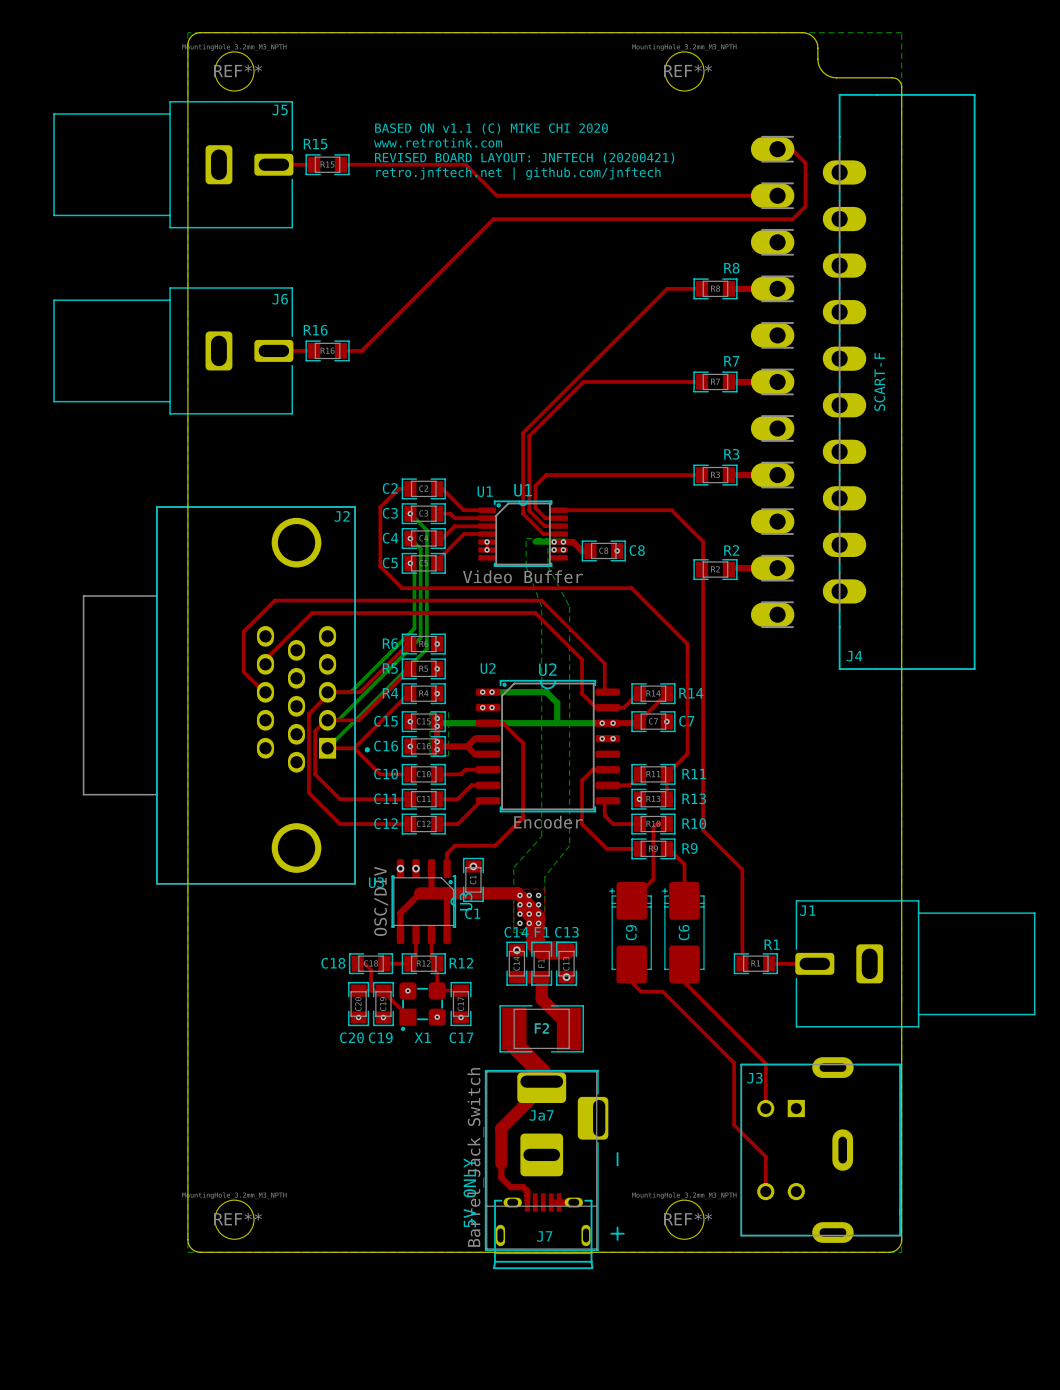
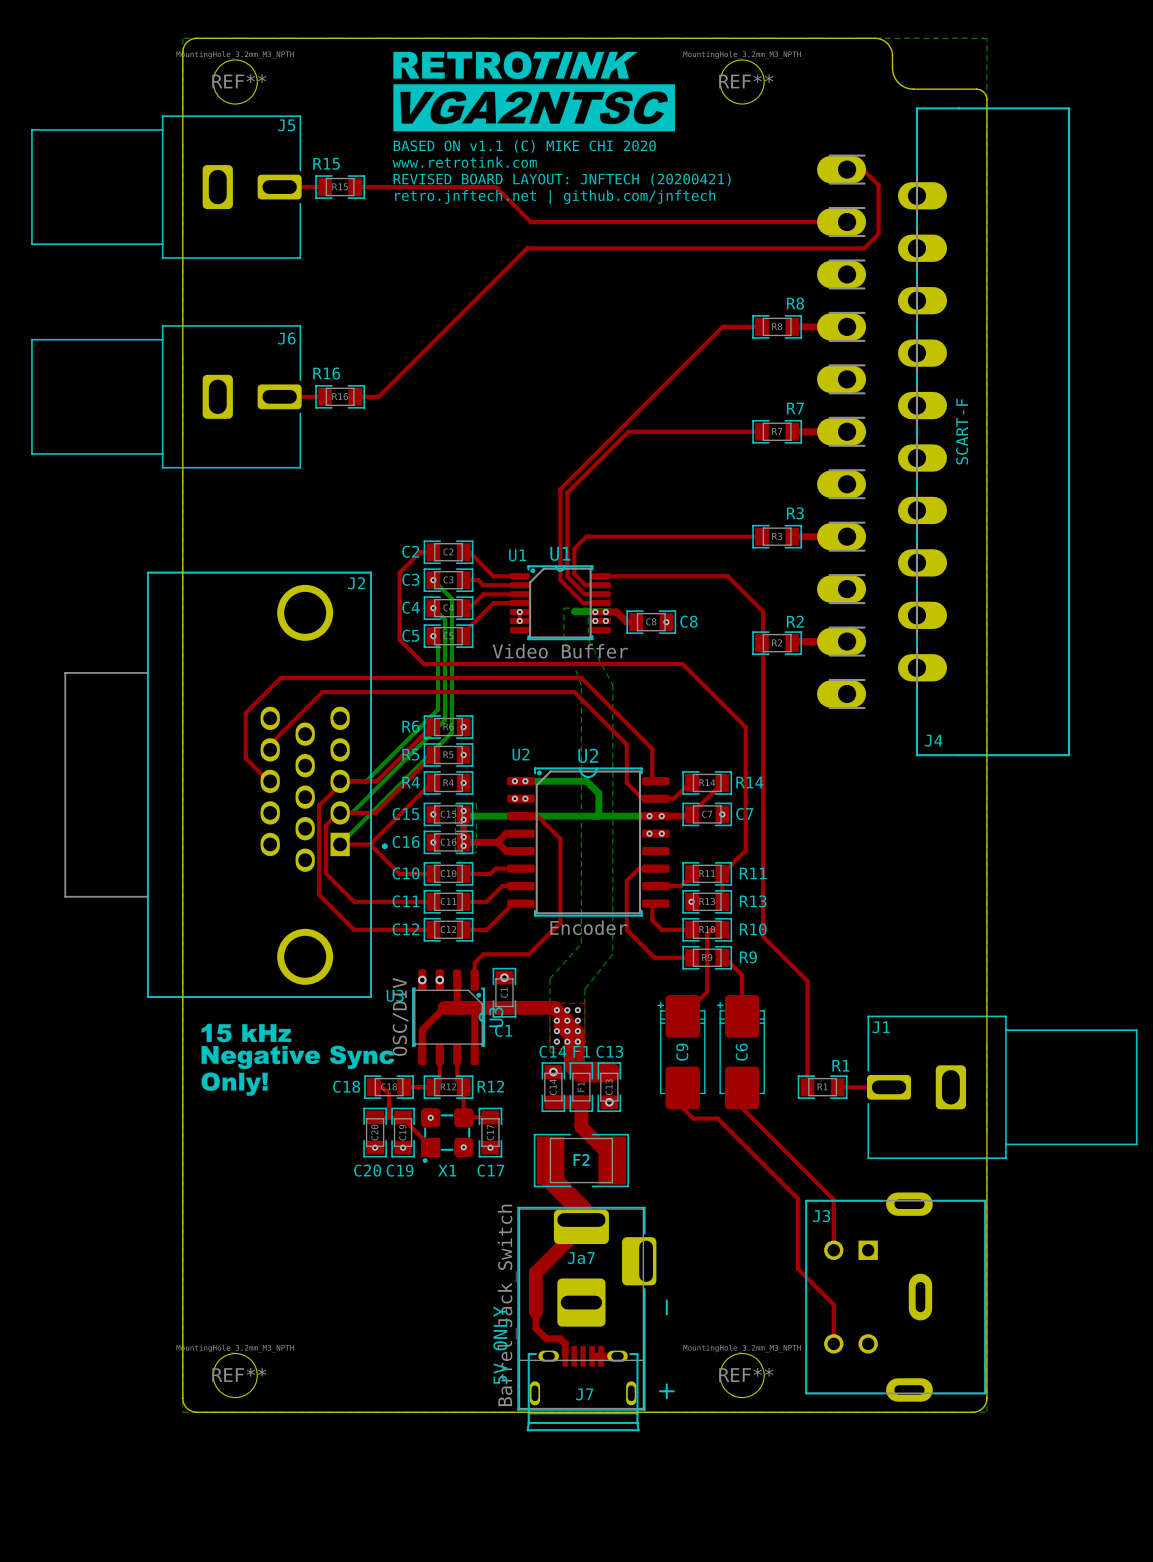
drawing: none -> [393, 51, 675, 132]
drawing: none -> [201, 1023, 395, 1096]

